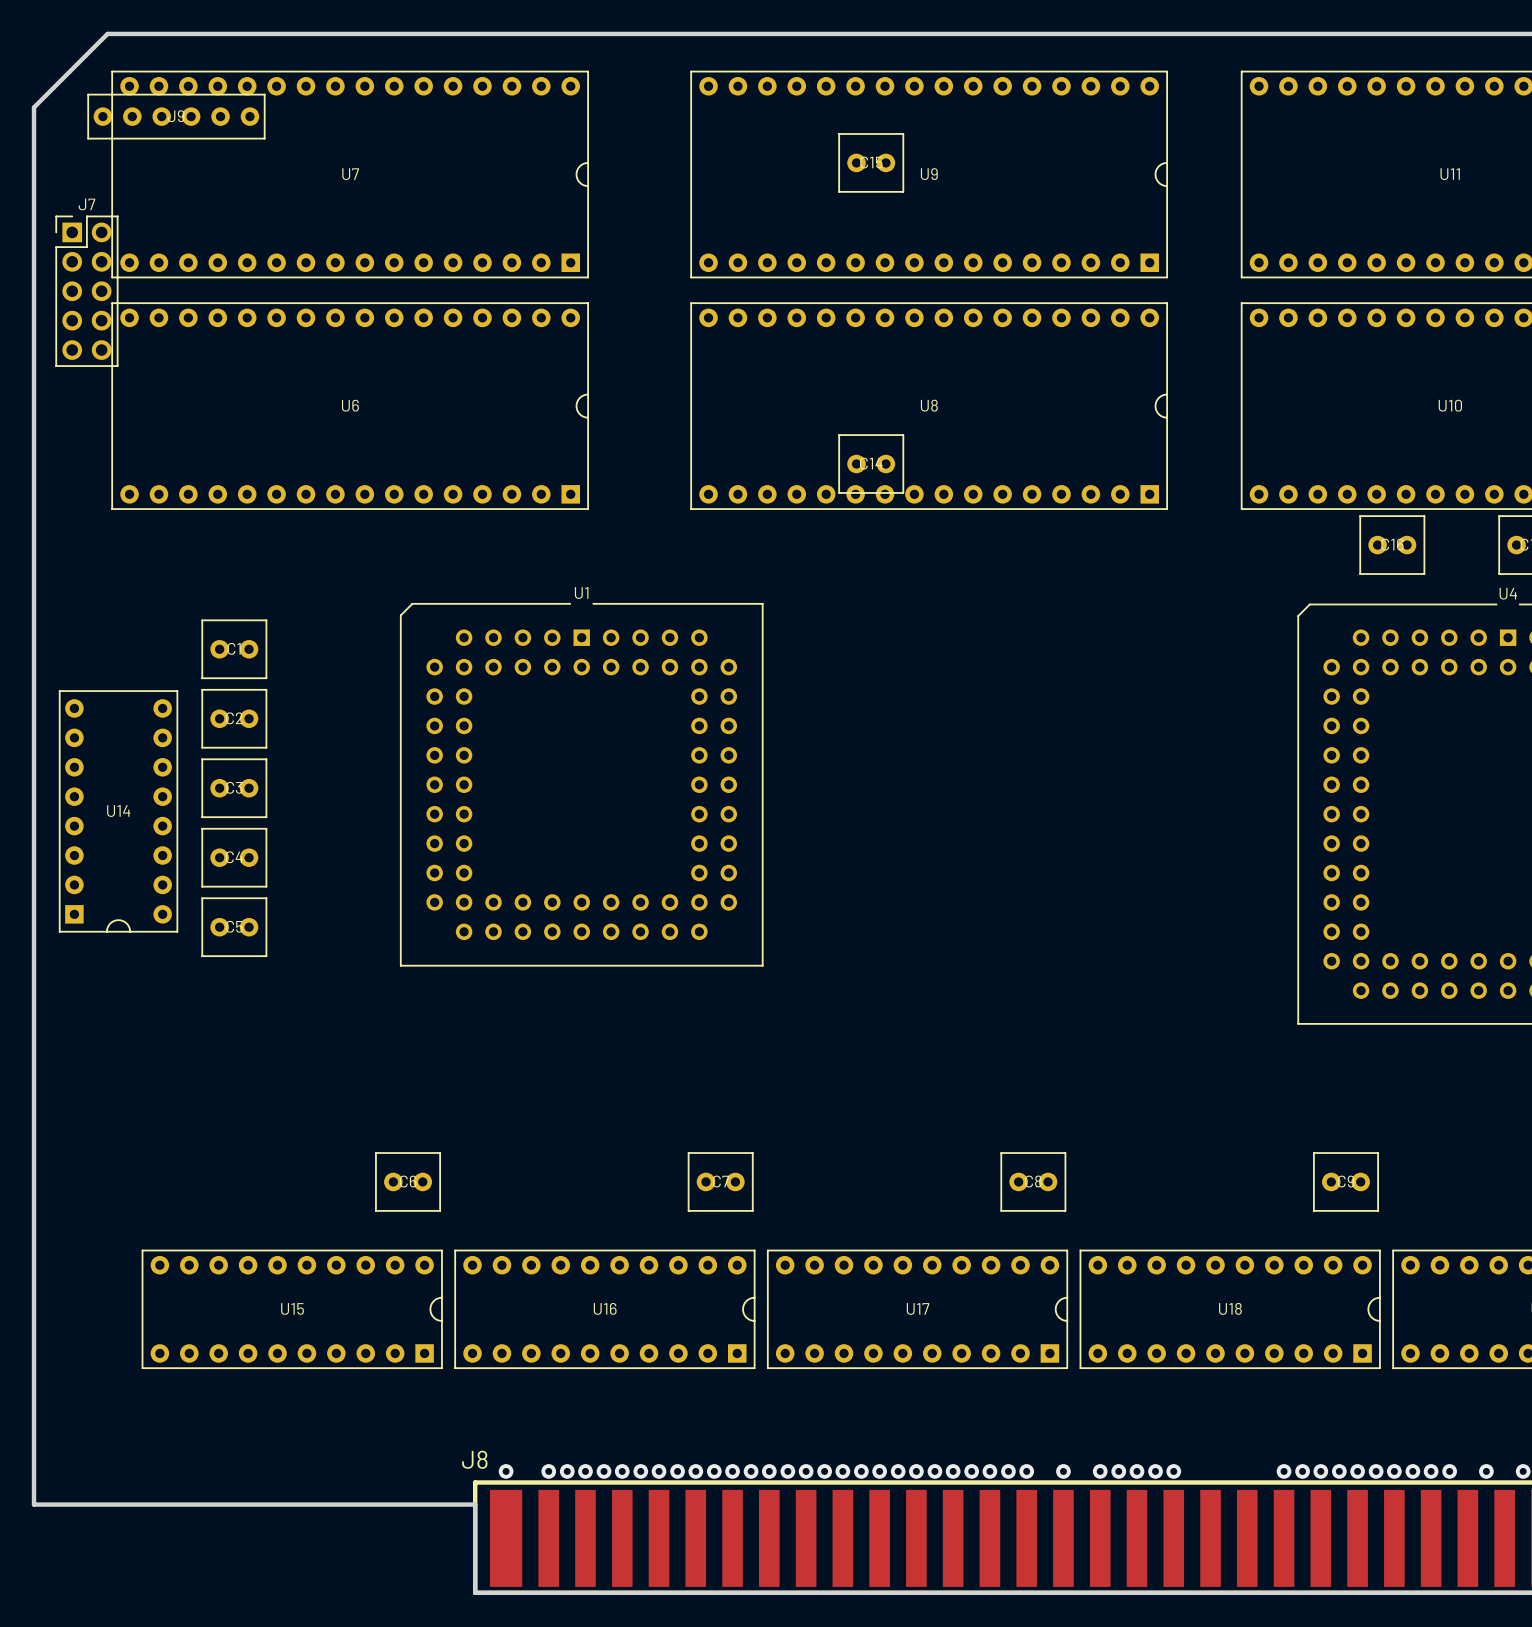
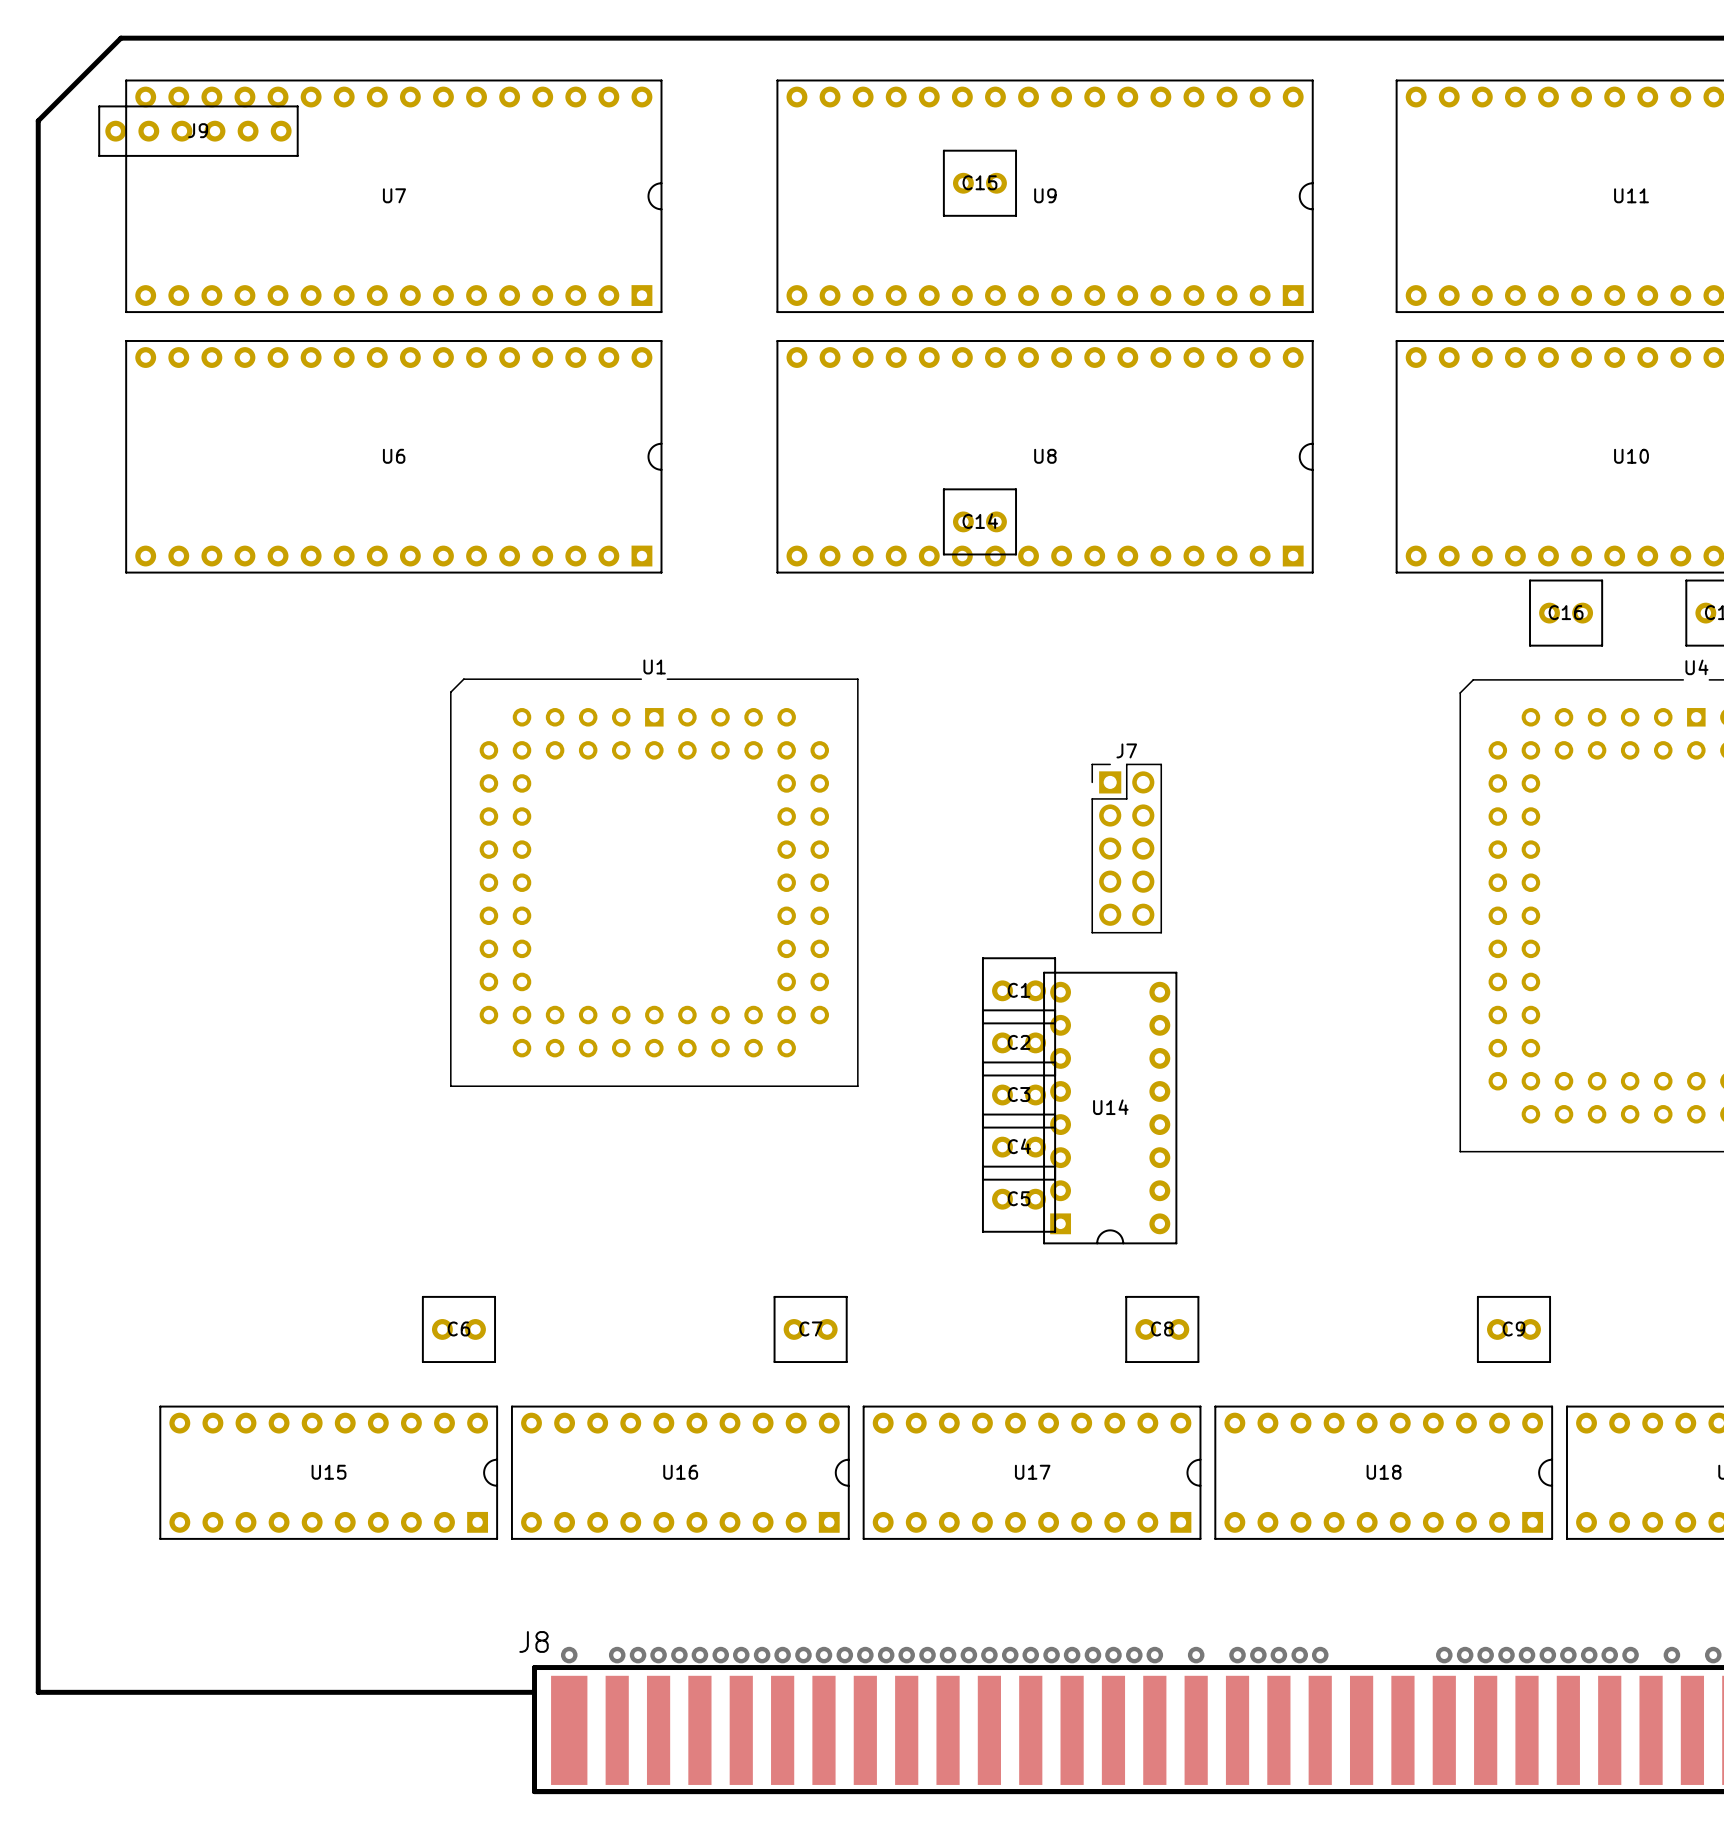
J7 position: (86, 291) -> (1126, 848)
C1 position: (234, 649) -> (1019, 990)
C2 position: (234, 718) -> (1019, 1042)
C3 position: (234, 788) -> (1019, 1095)
U14 position: (118, 811) -> (1110, 1108)
C4 position: (234, 857) -> (1019, 1147)
C5 position: (234, 927) -> (1019, 1199)

